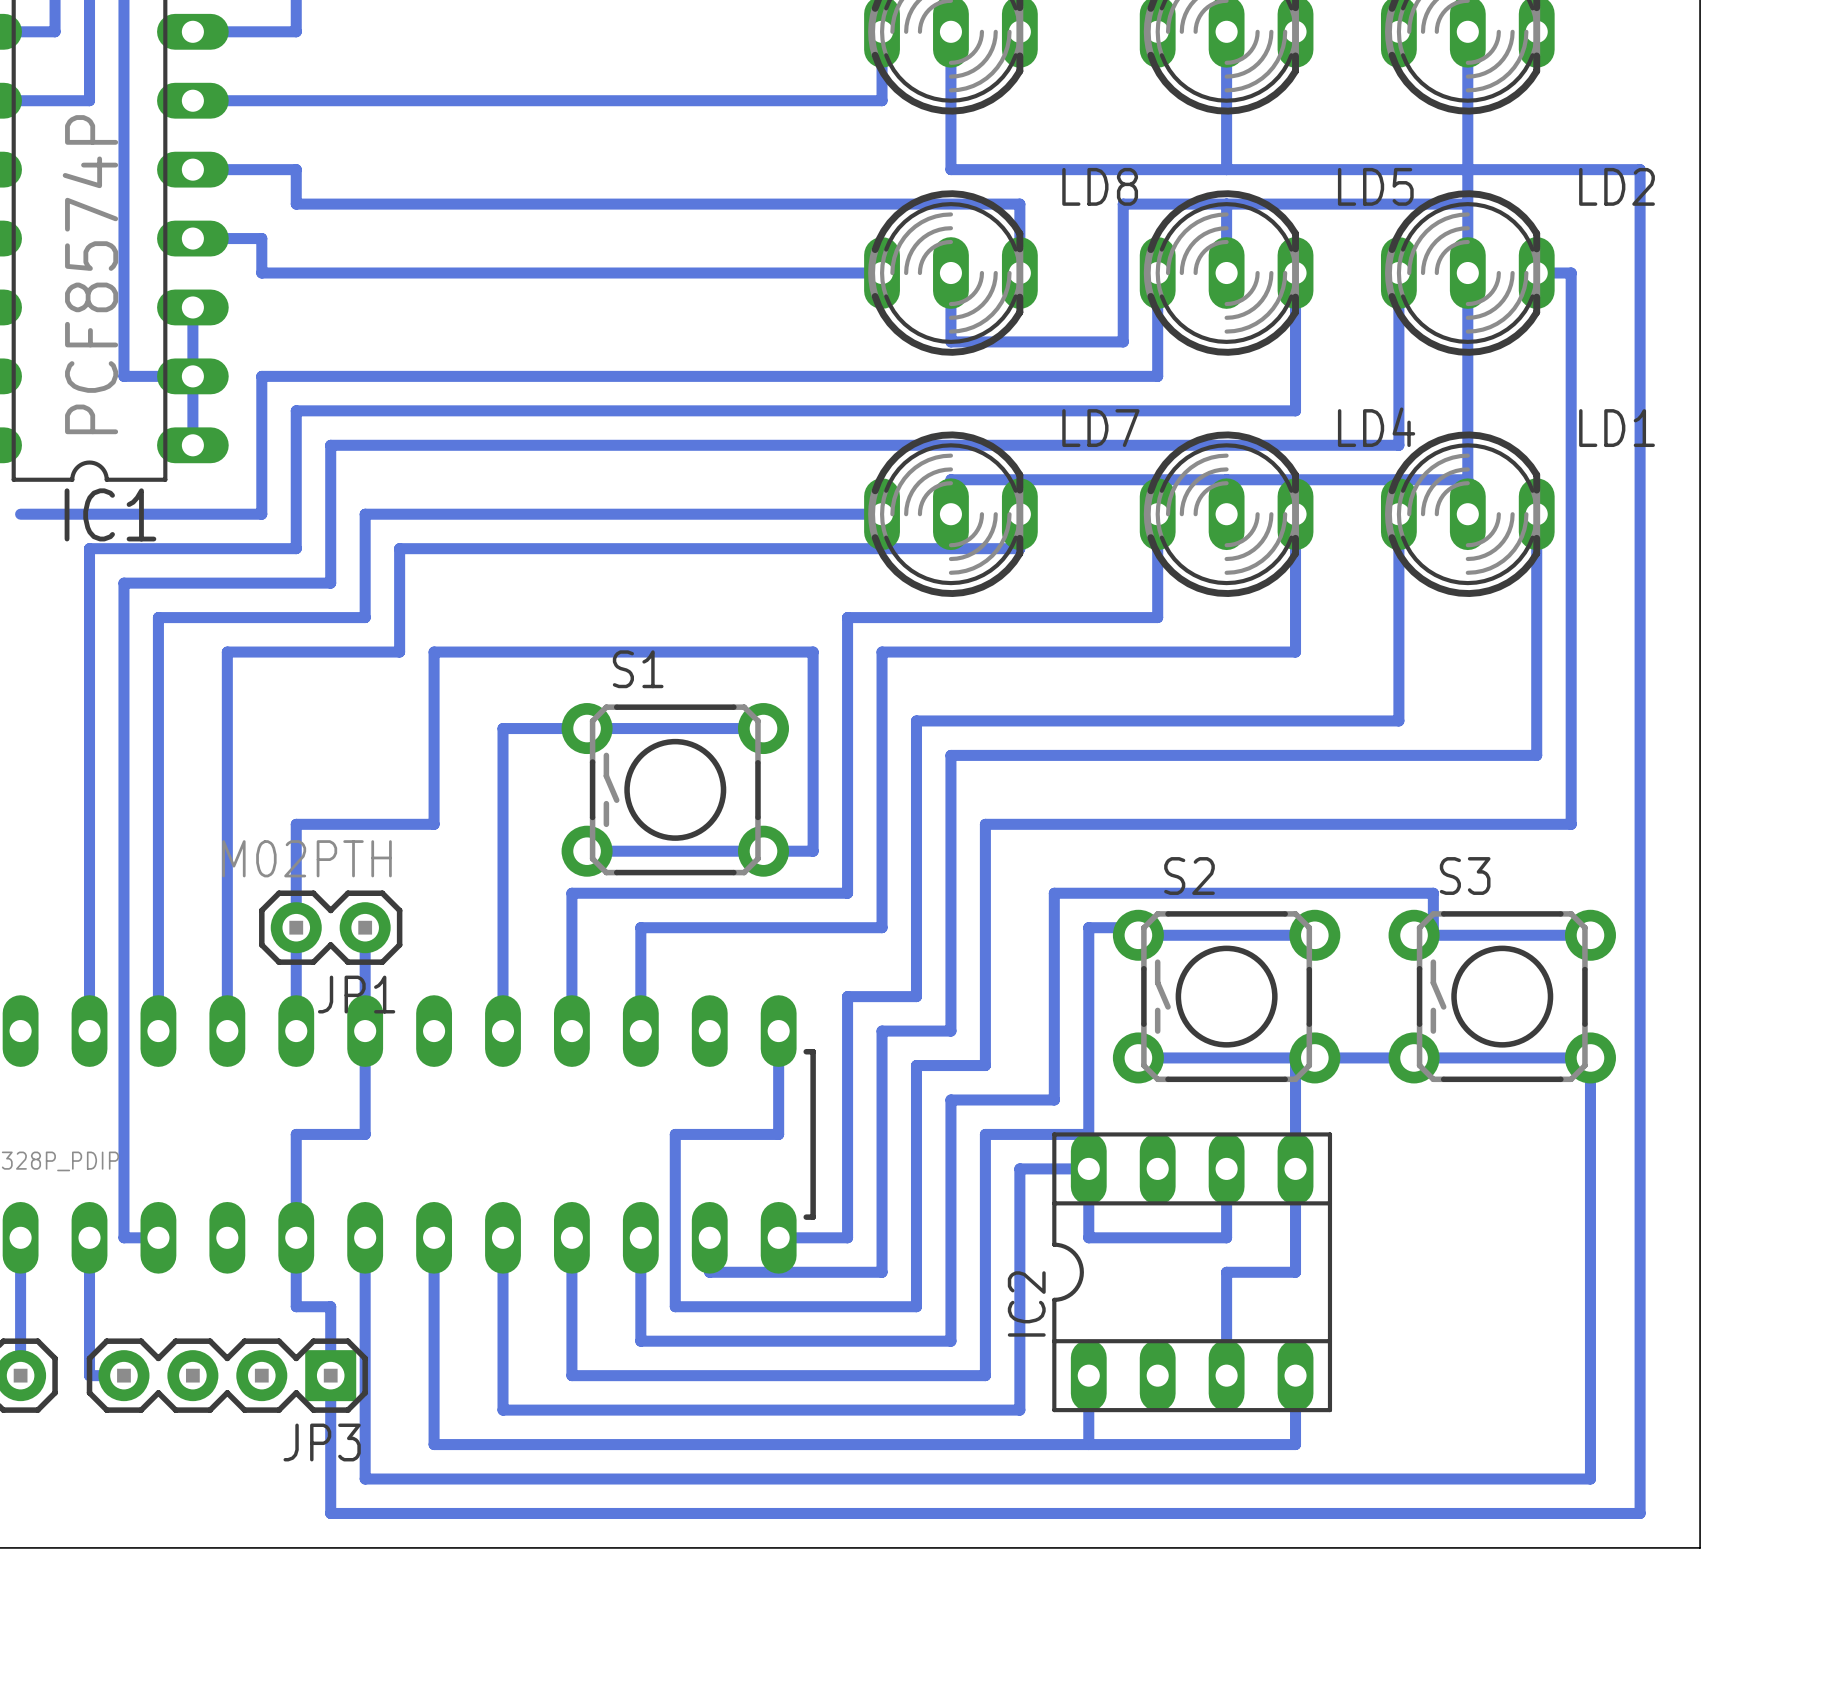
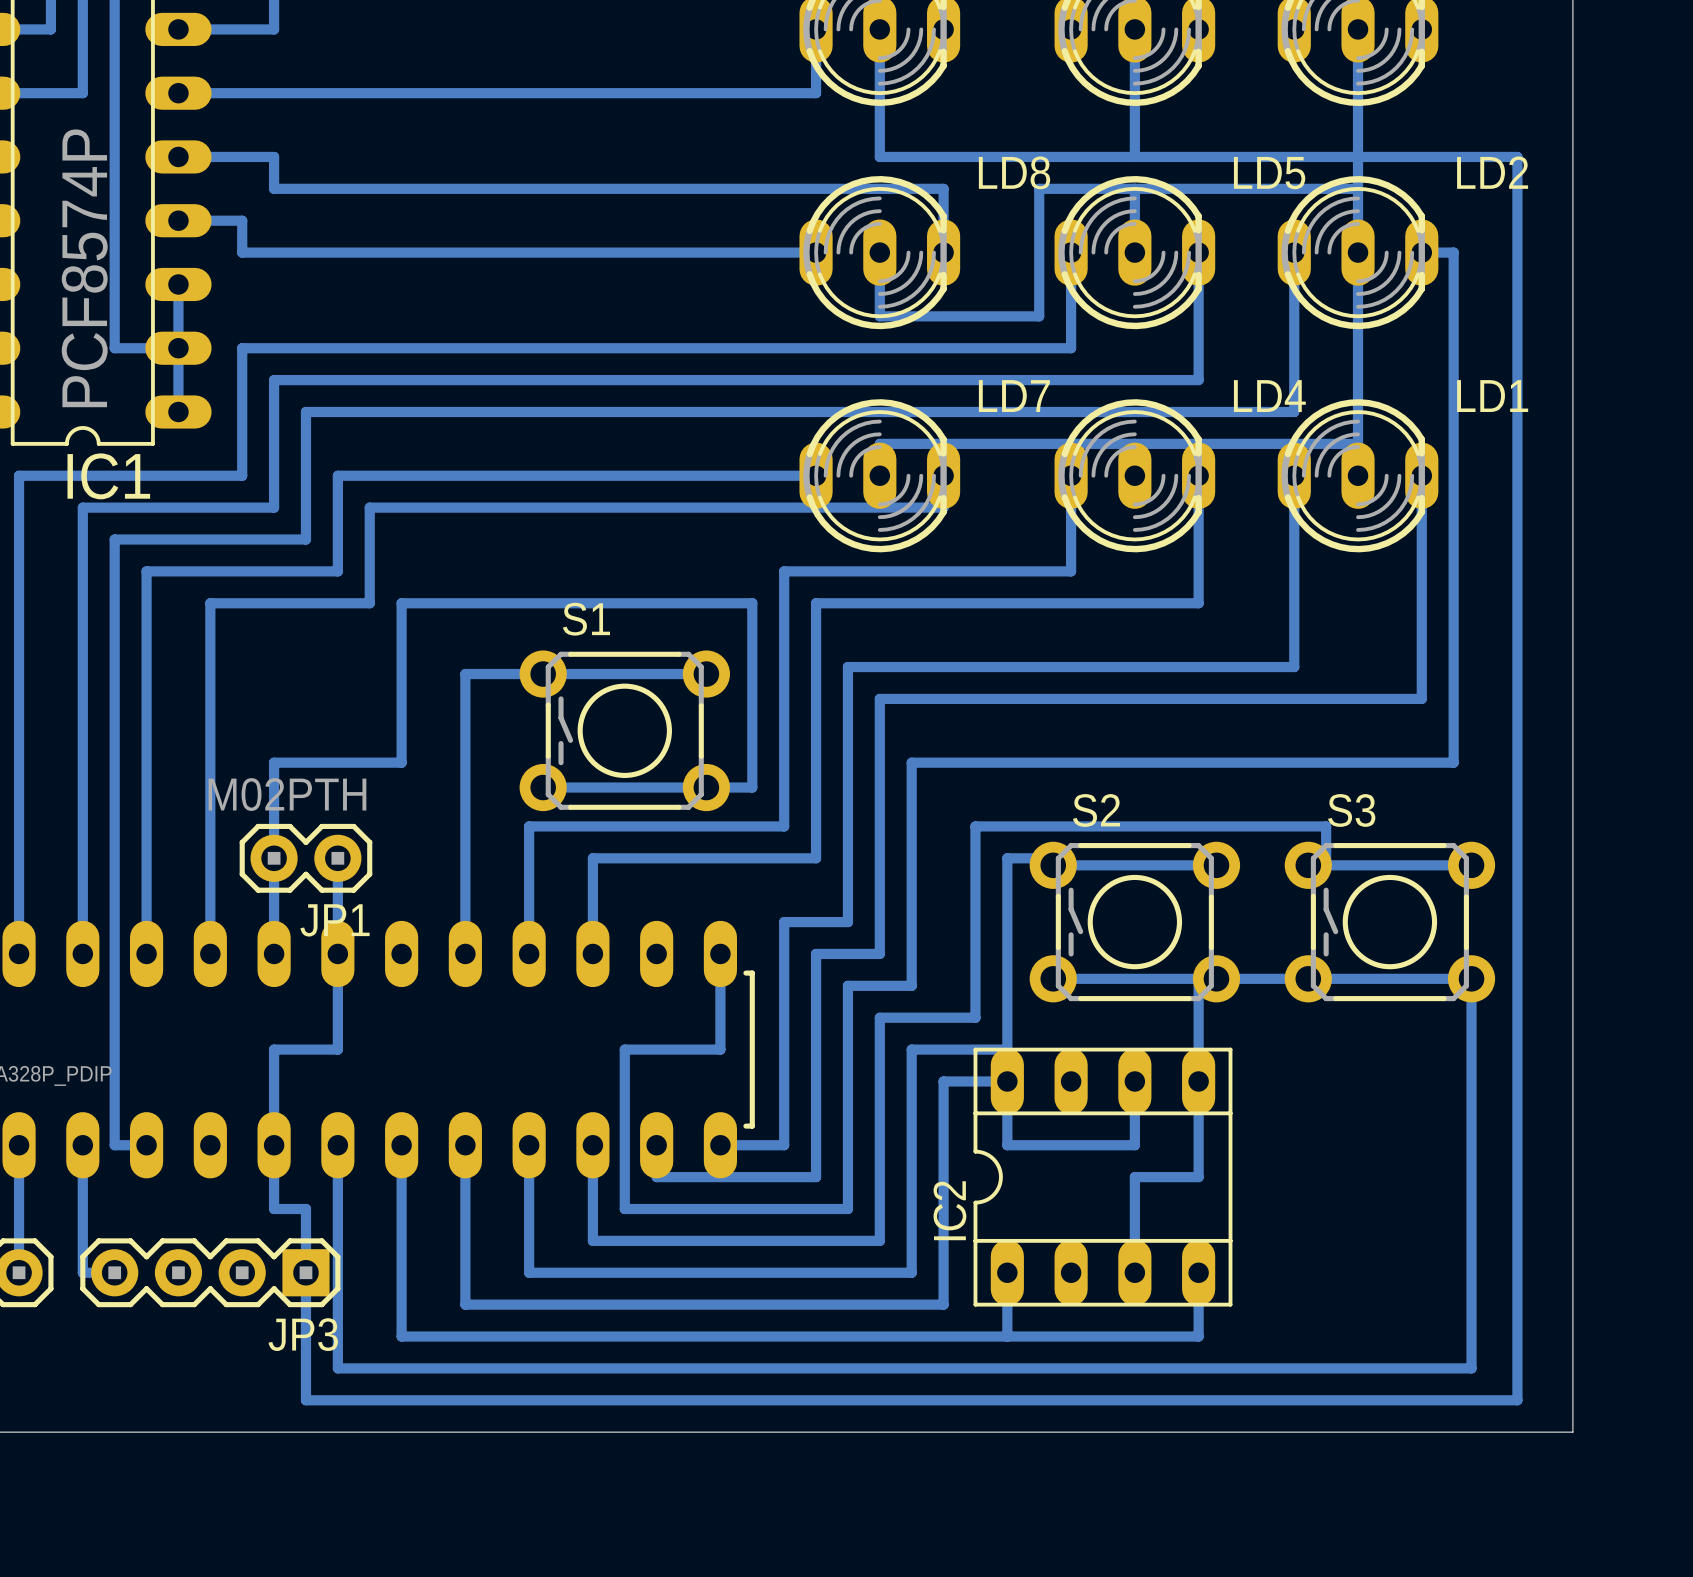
bottom track: none -> (19, 475) (19, 953)

